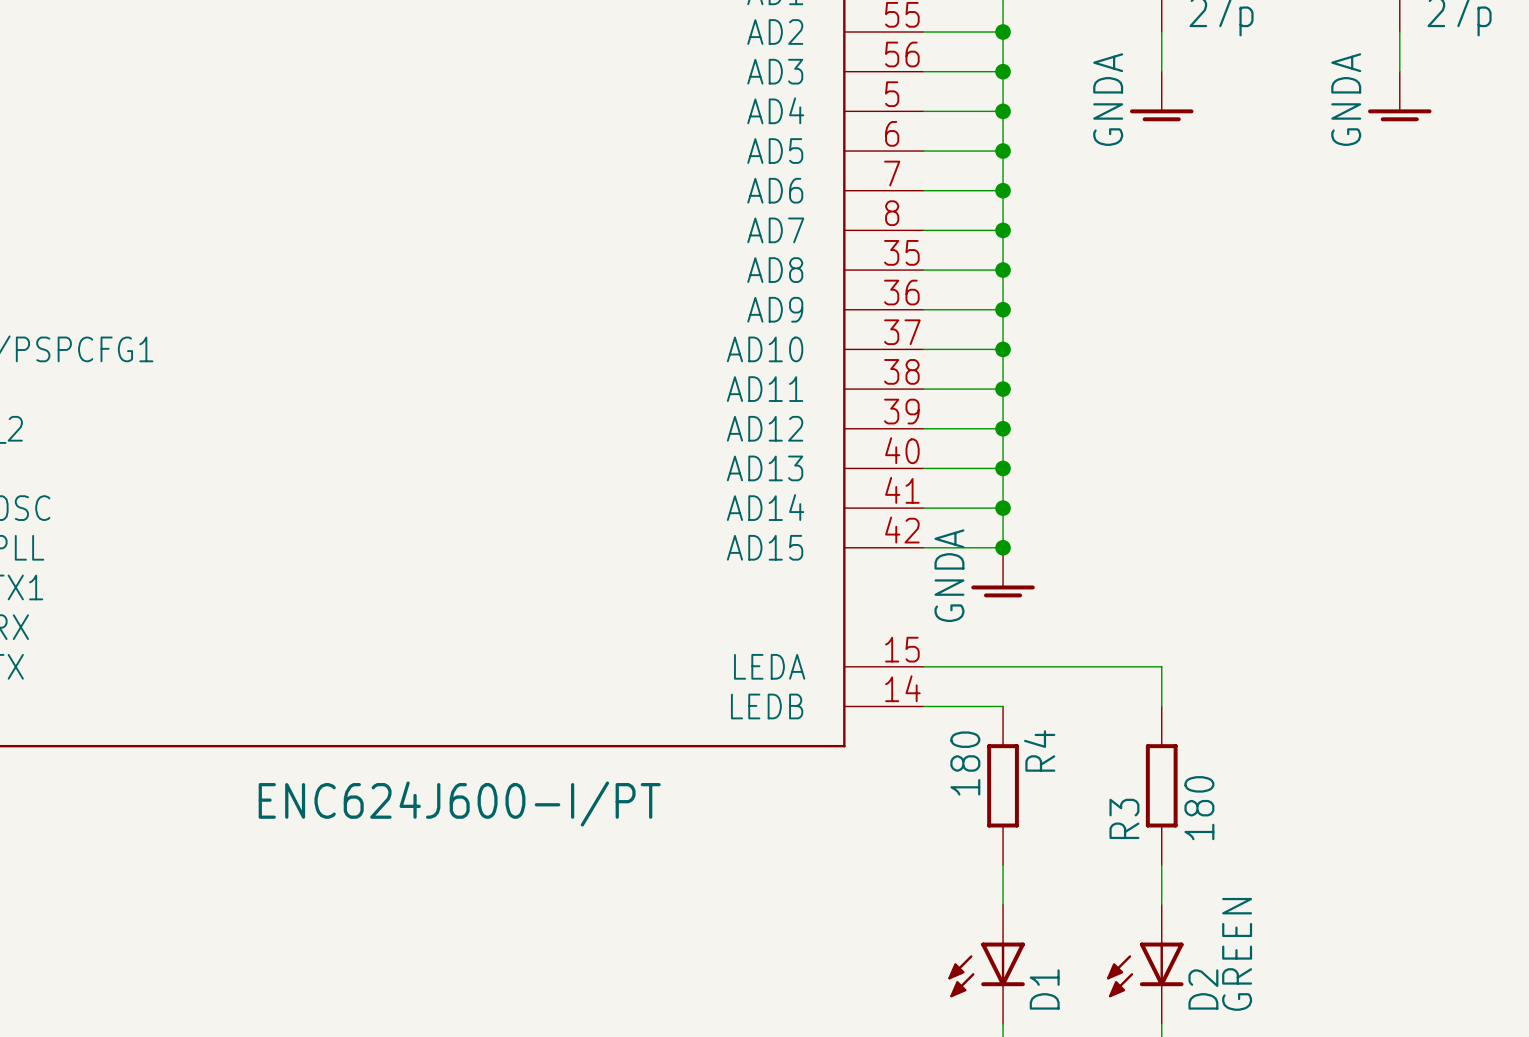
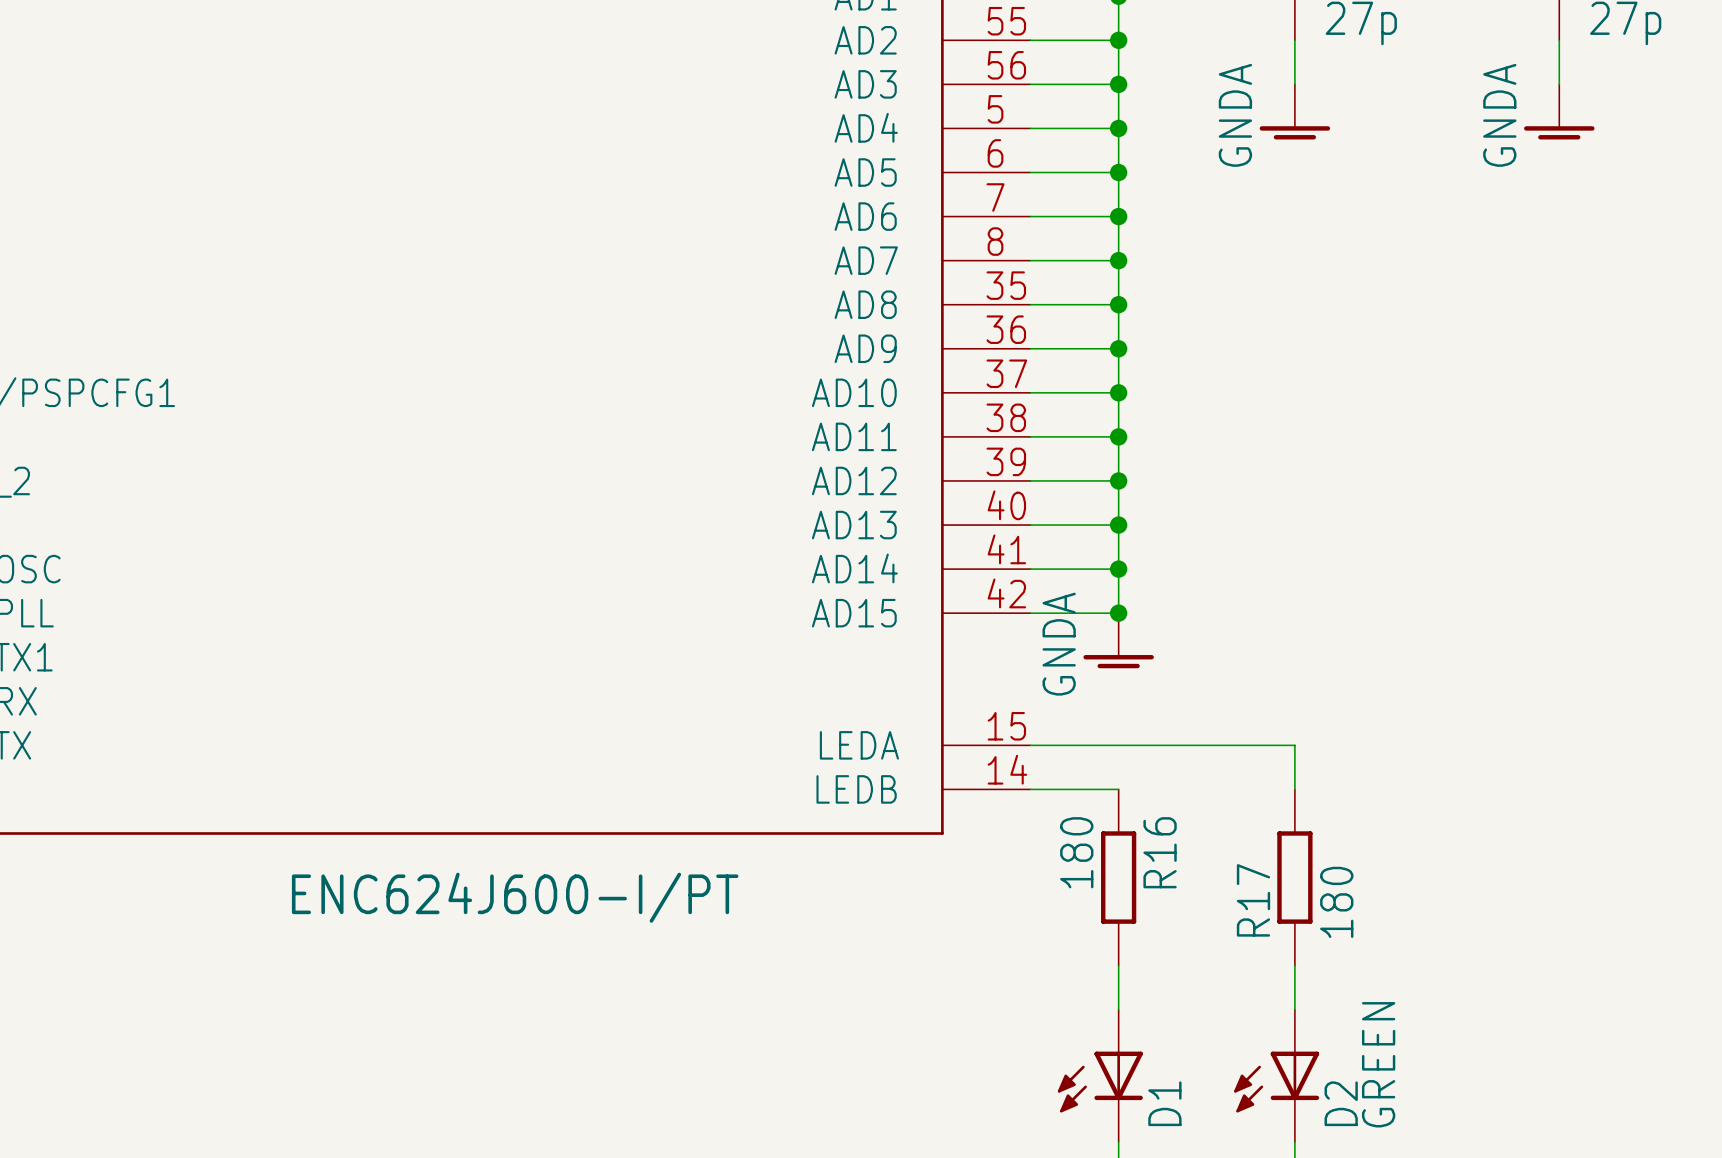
R4 name: R4 (1039, 750) -> R16 (1160, 852)
R3 name: R3 (1124, 818) -> R17 (1253, 900)

